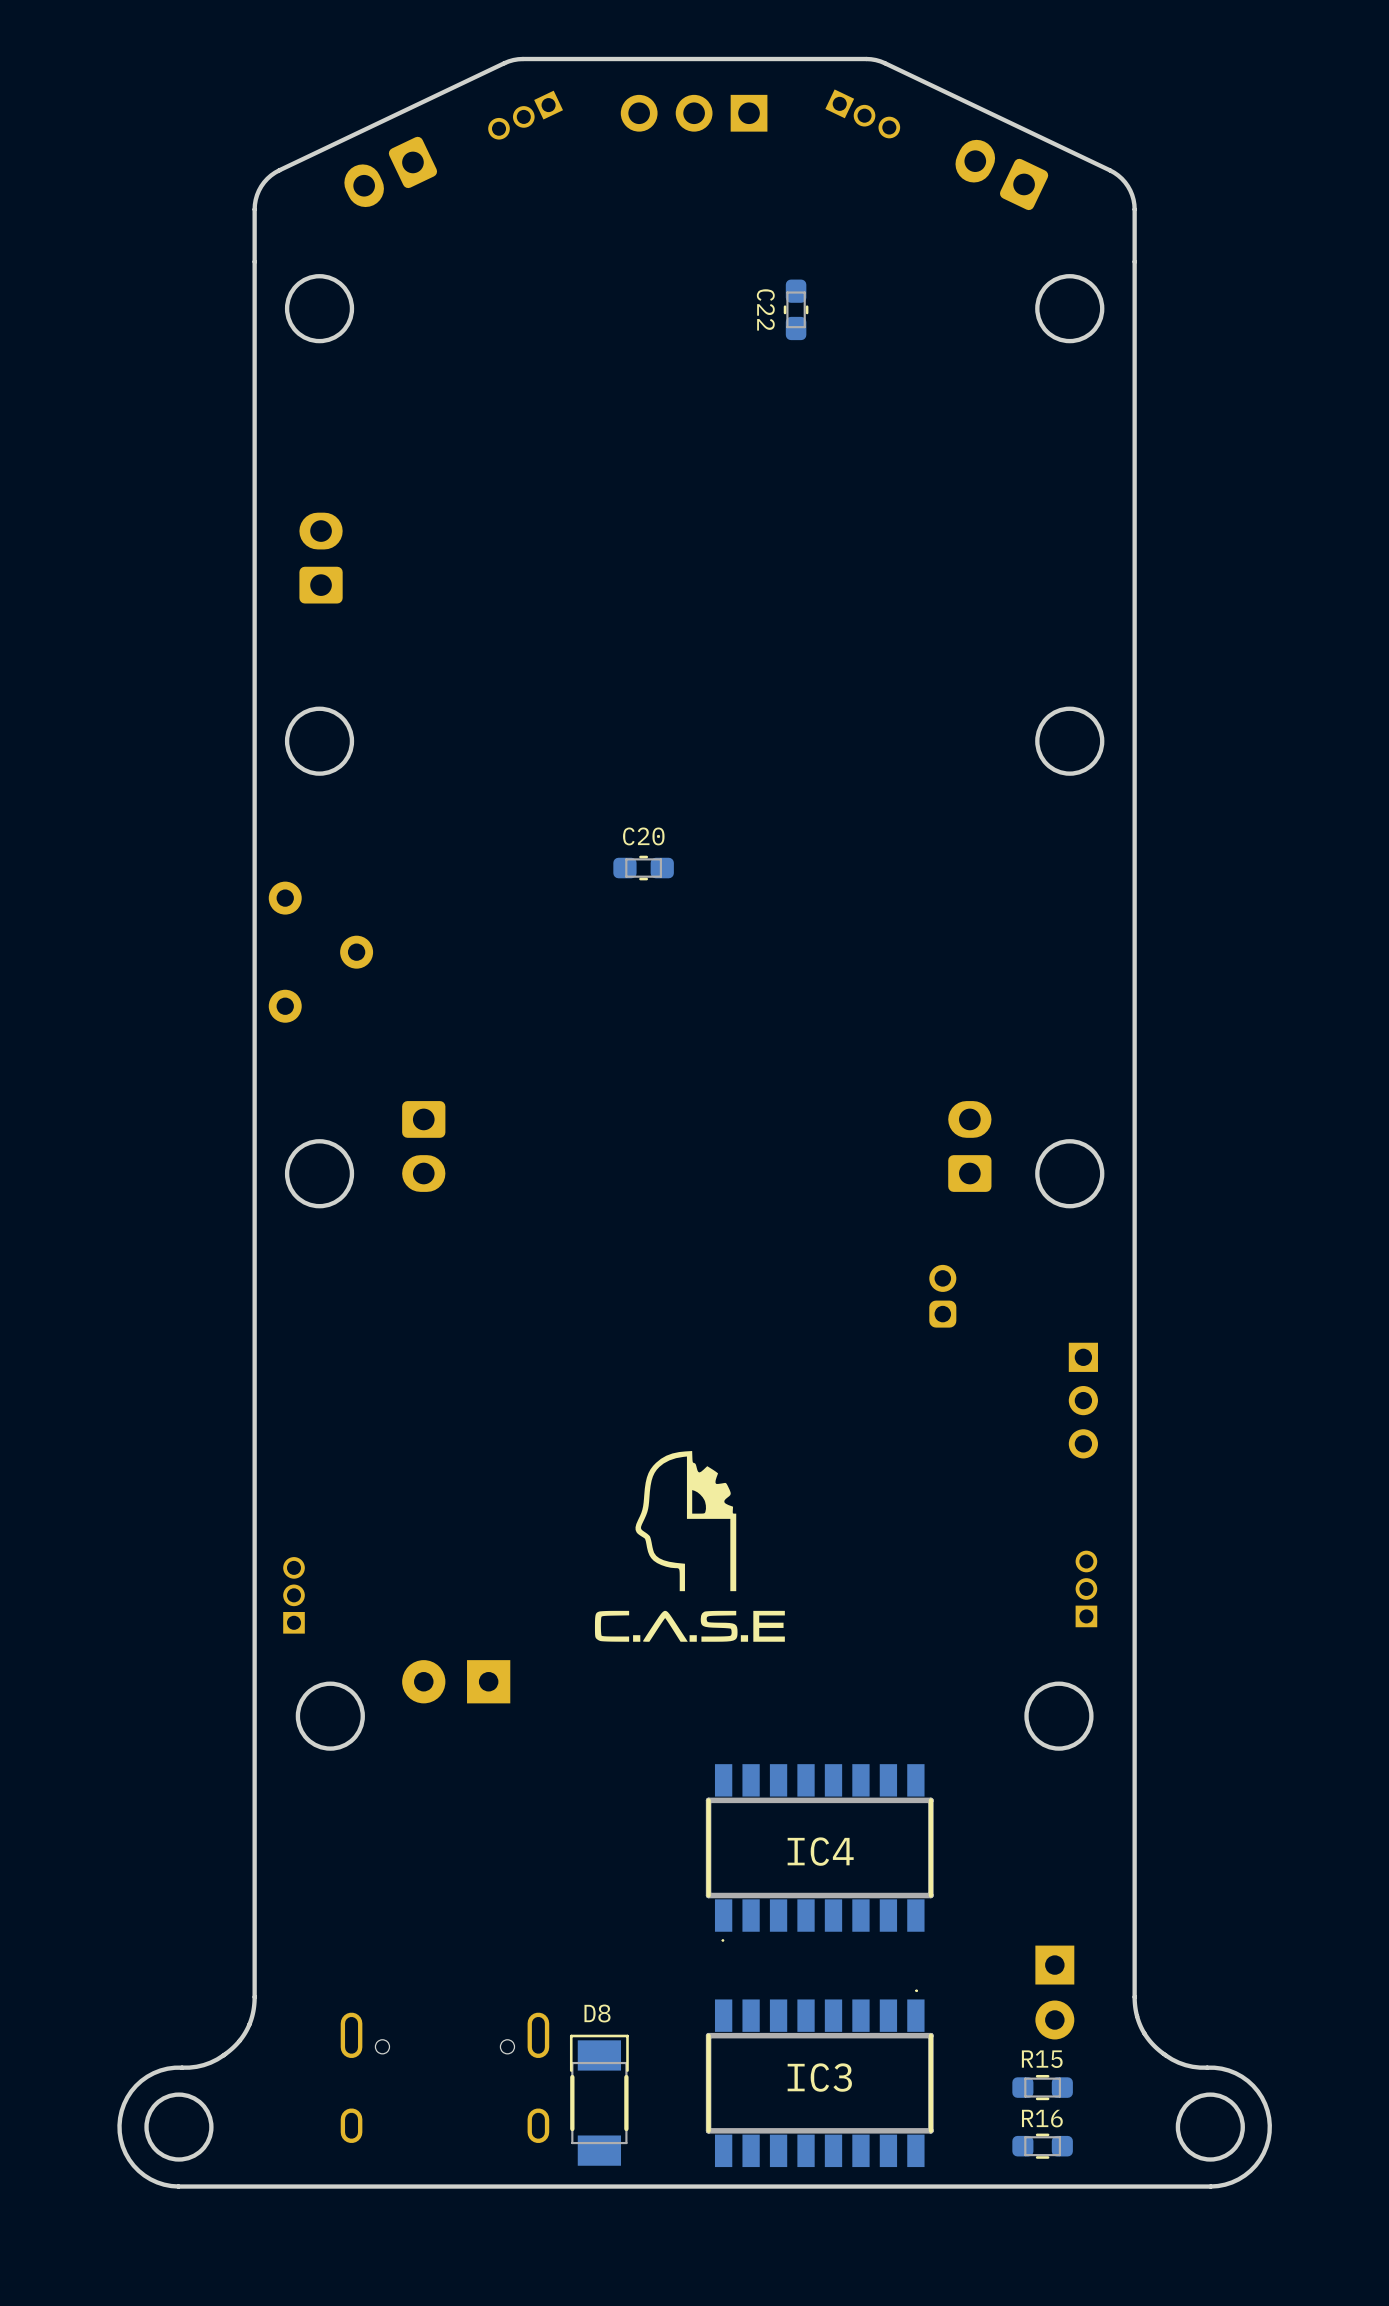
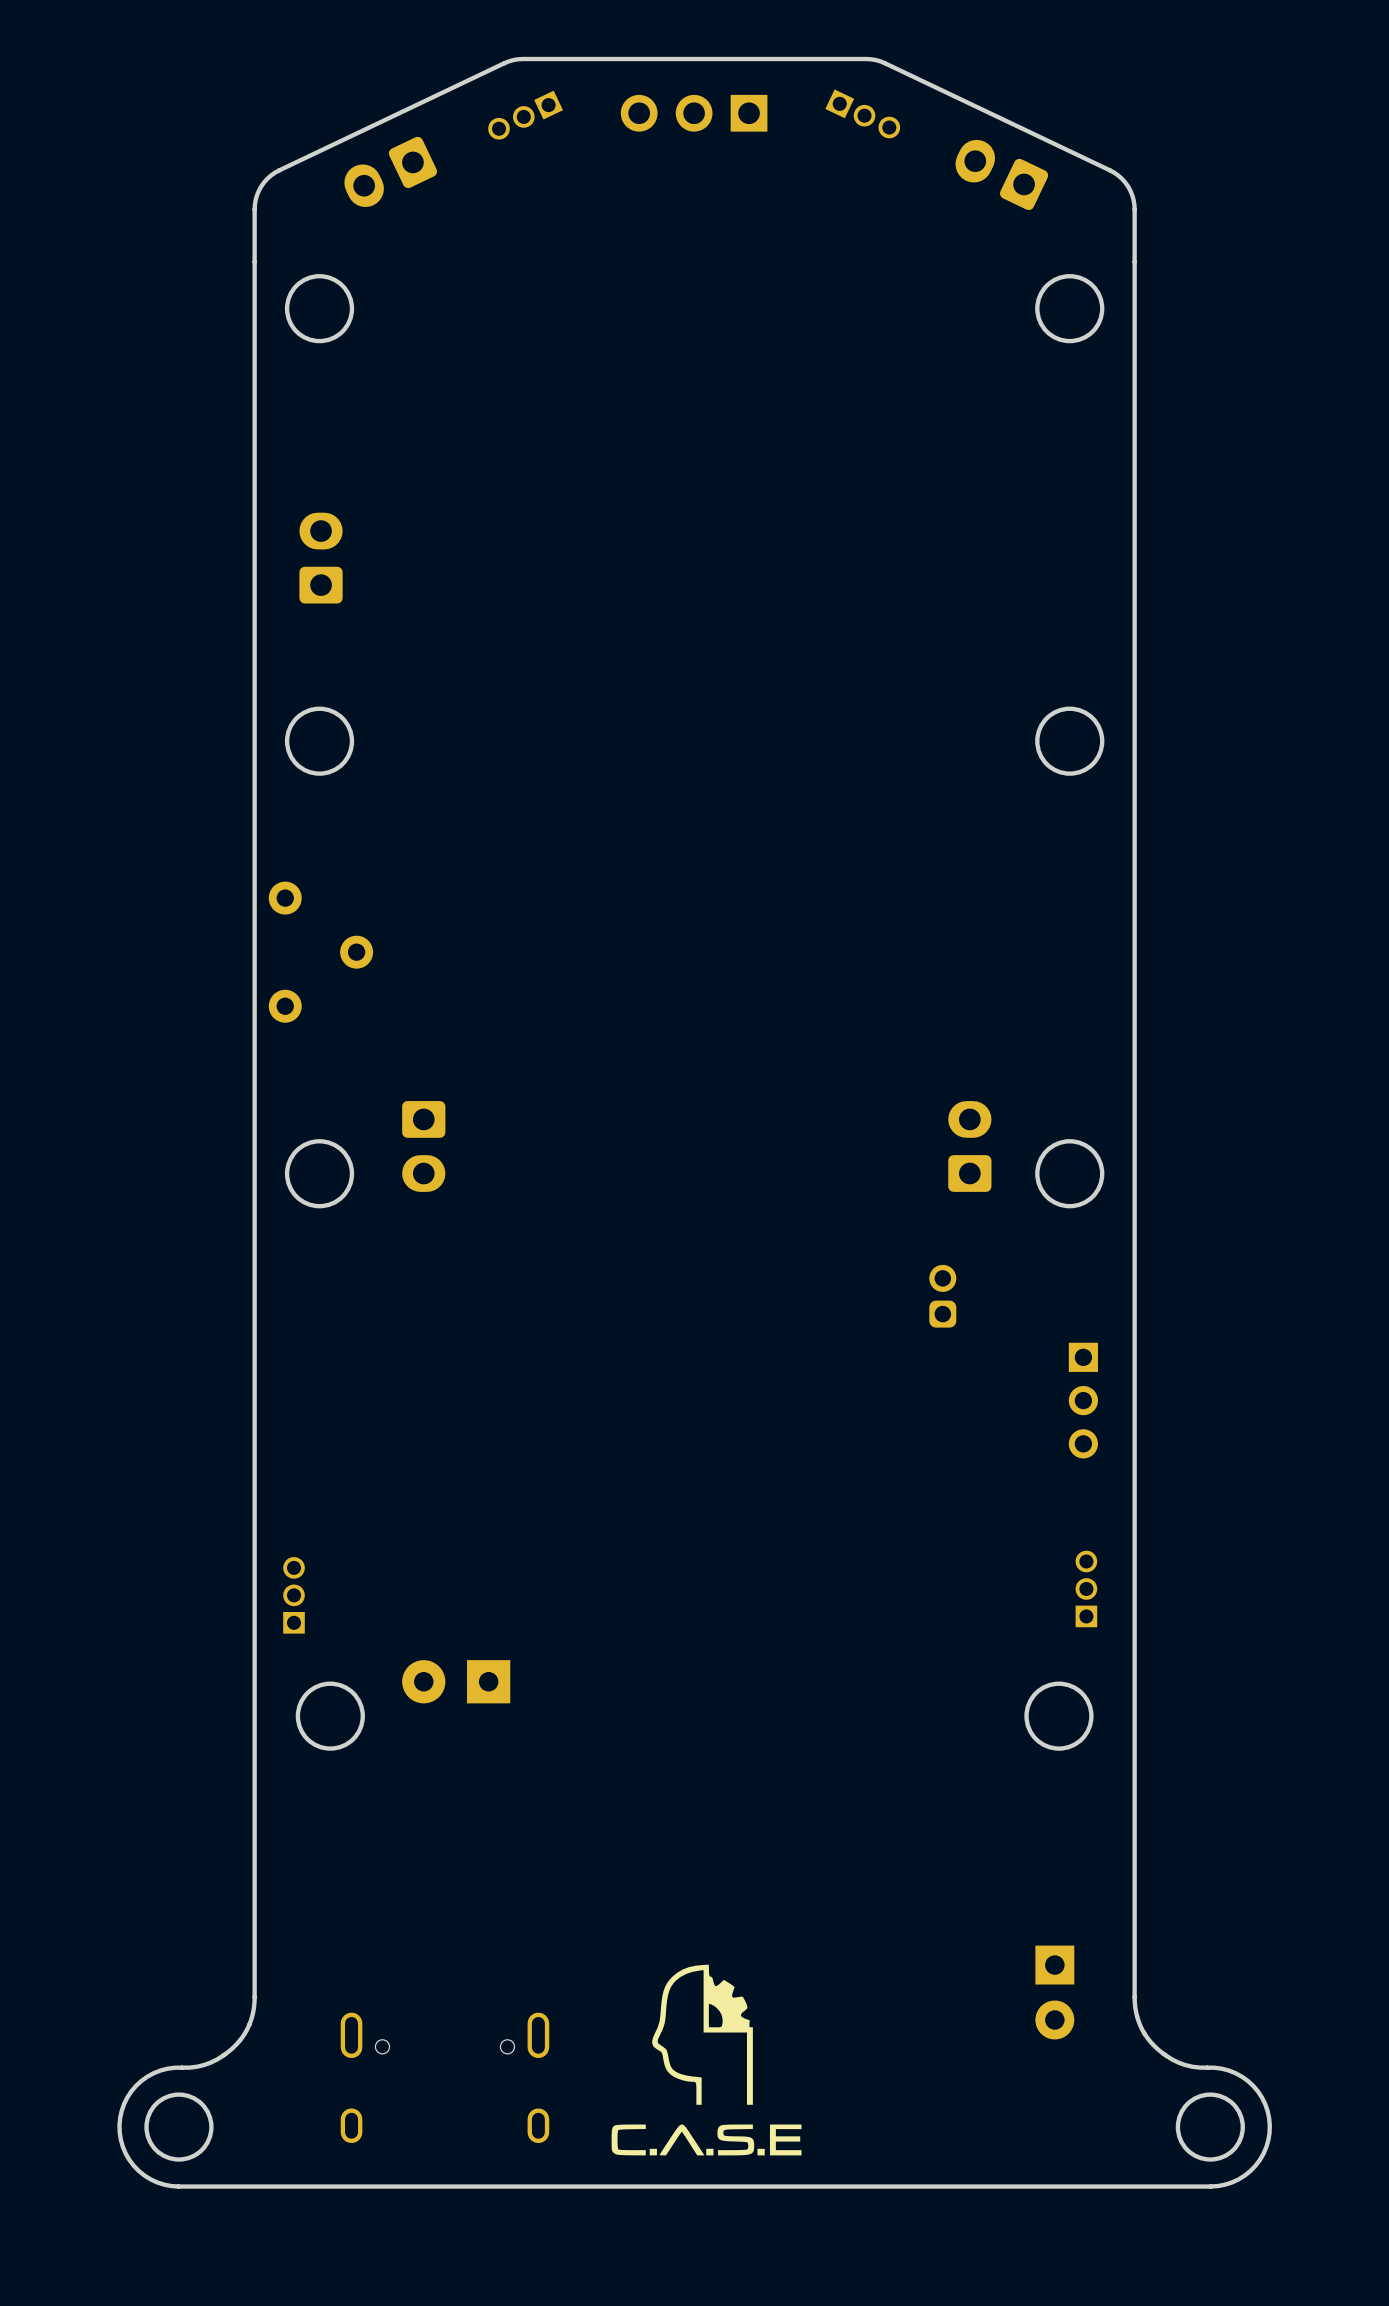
C22: (796, 309) -> none
C20: (643, 868) -> none
drawing position: (689, 1546) -> (706, 2060)
IC4: (819, 1852) -> none
IC3: (819, 2078) -> none
R15: (1042, 2087) -> none
D8: (599, 2100) -> none
R16: (1042, 2146) -> none

